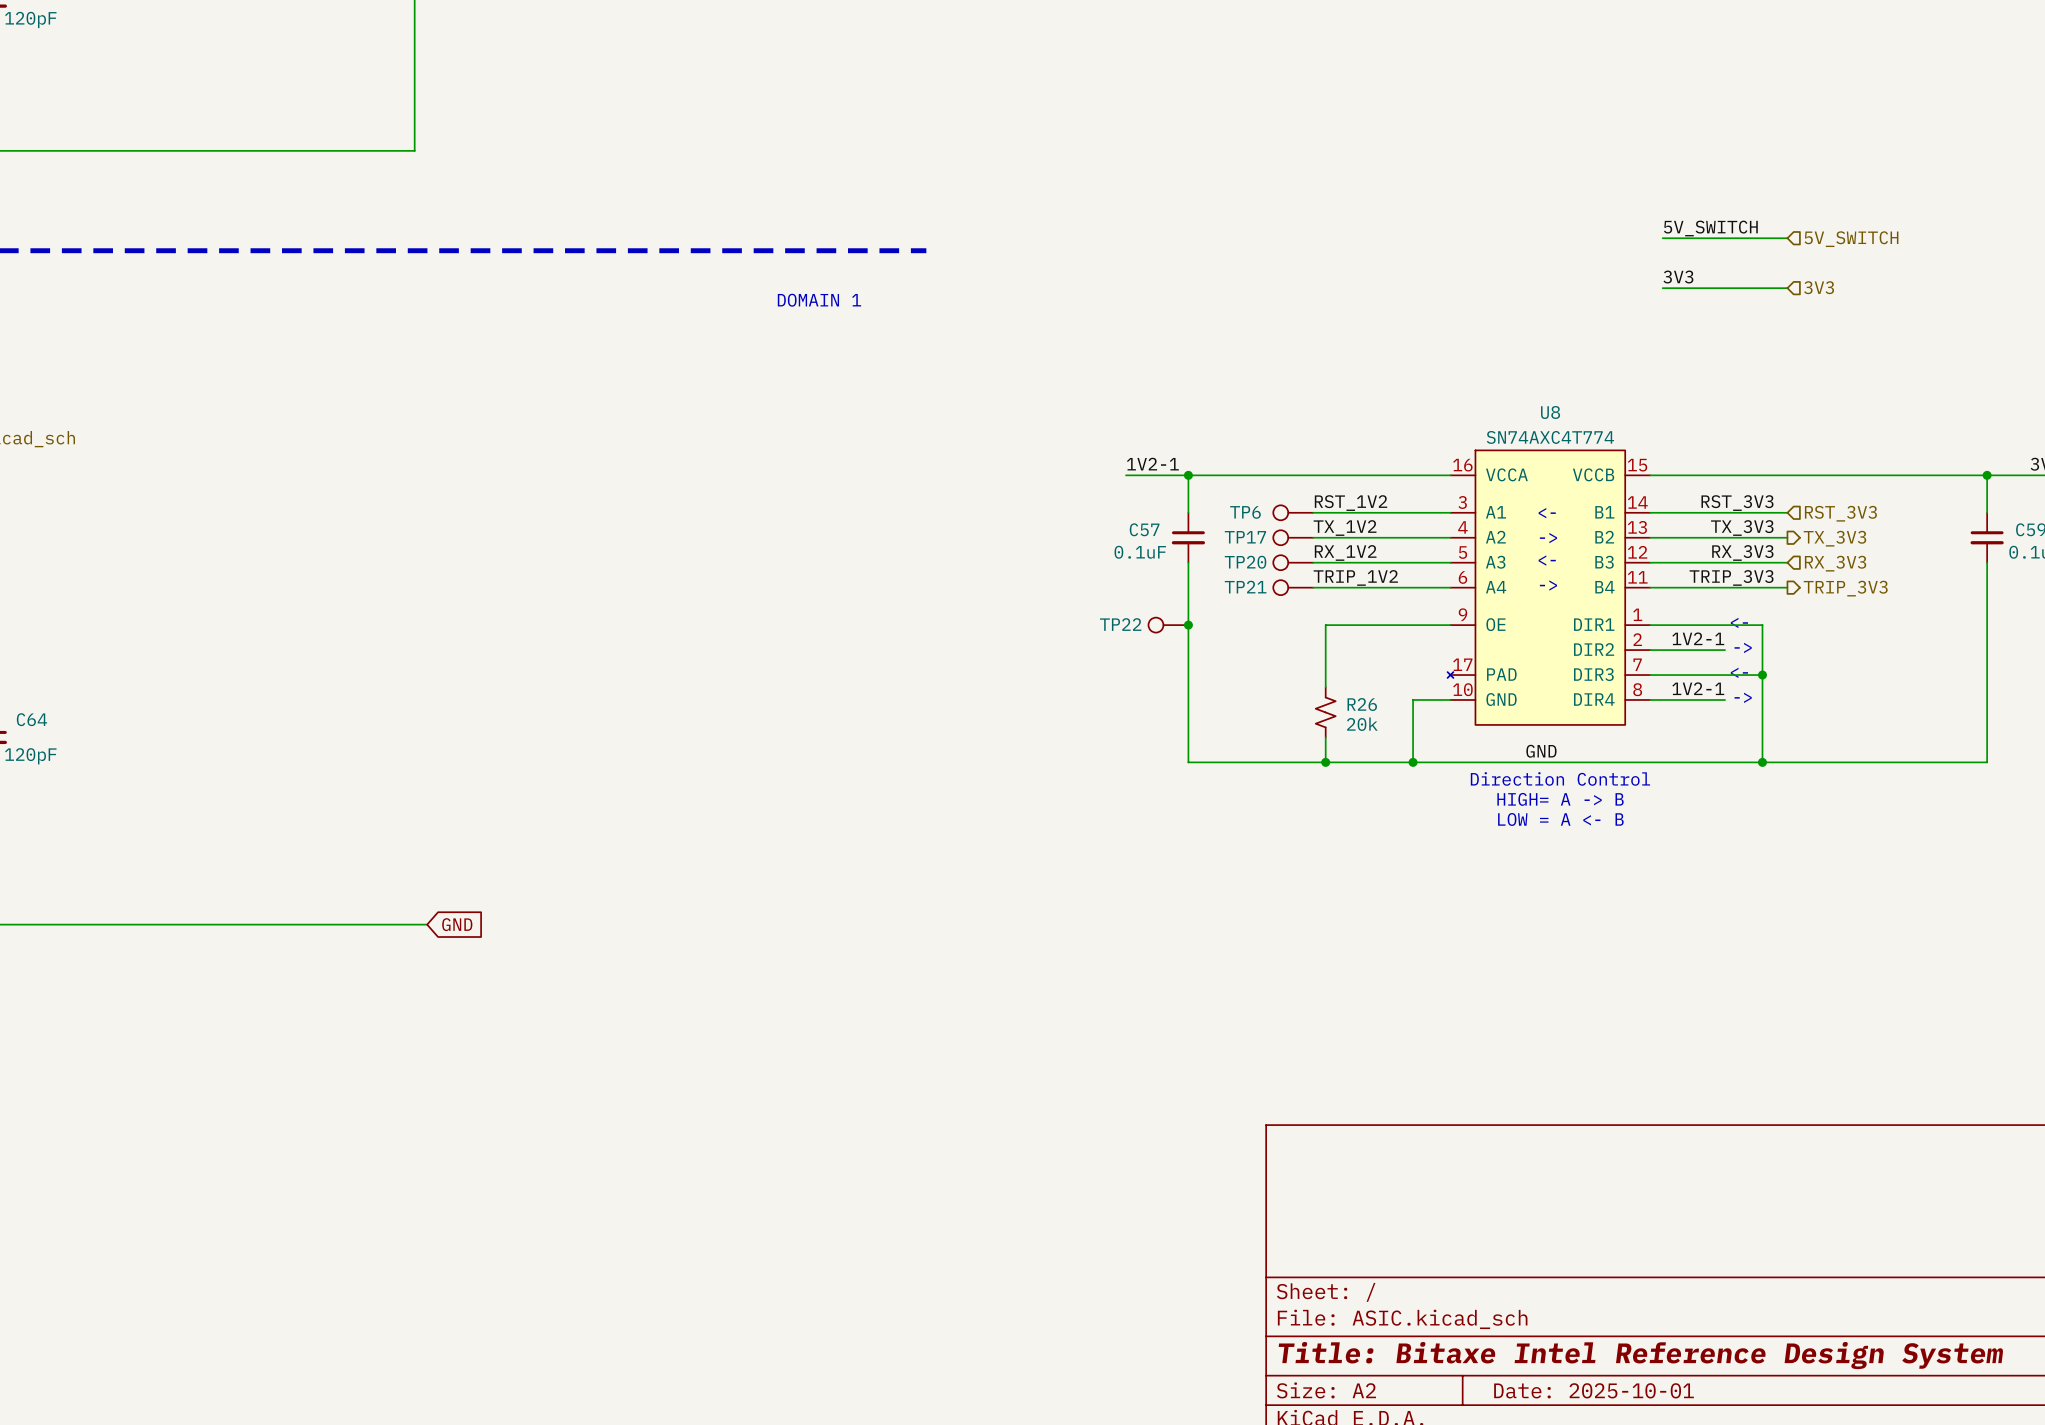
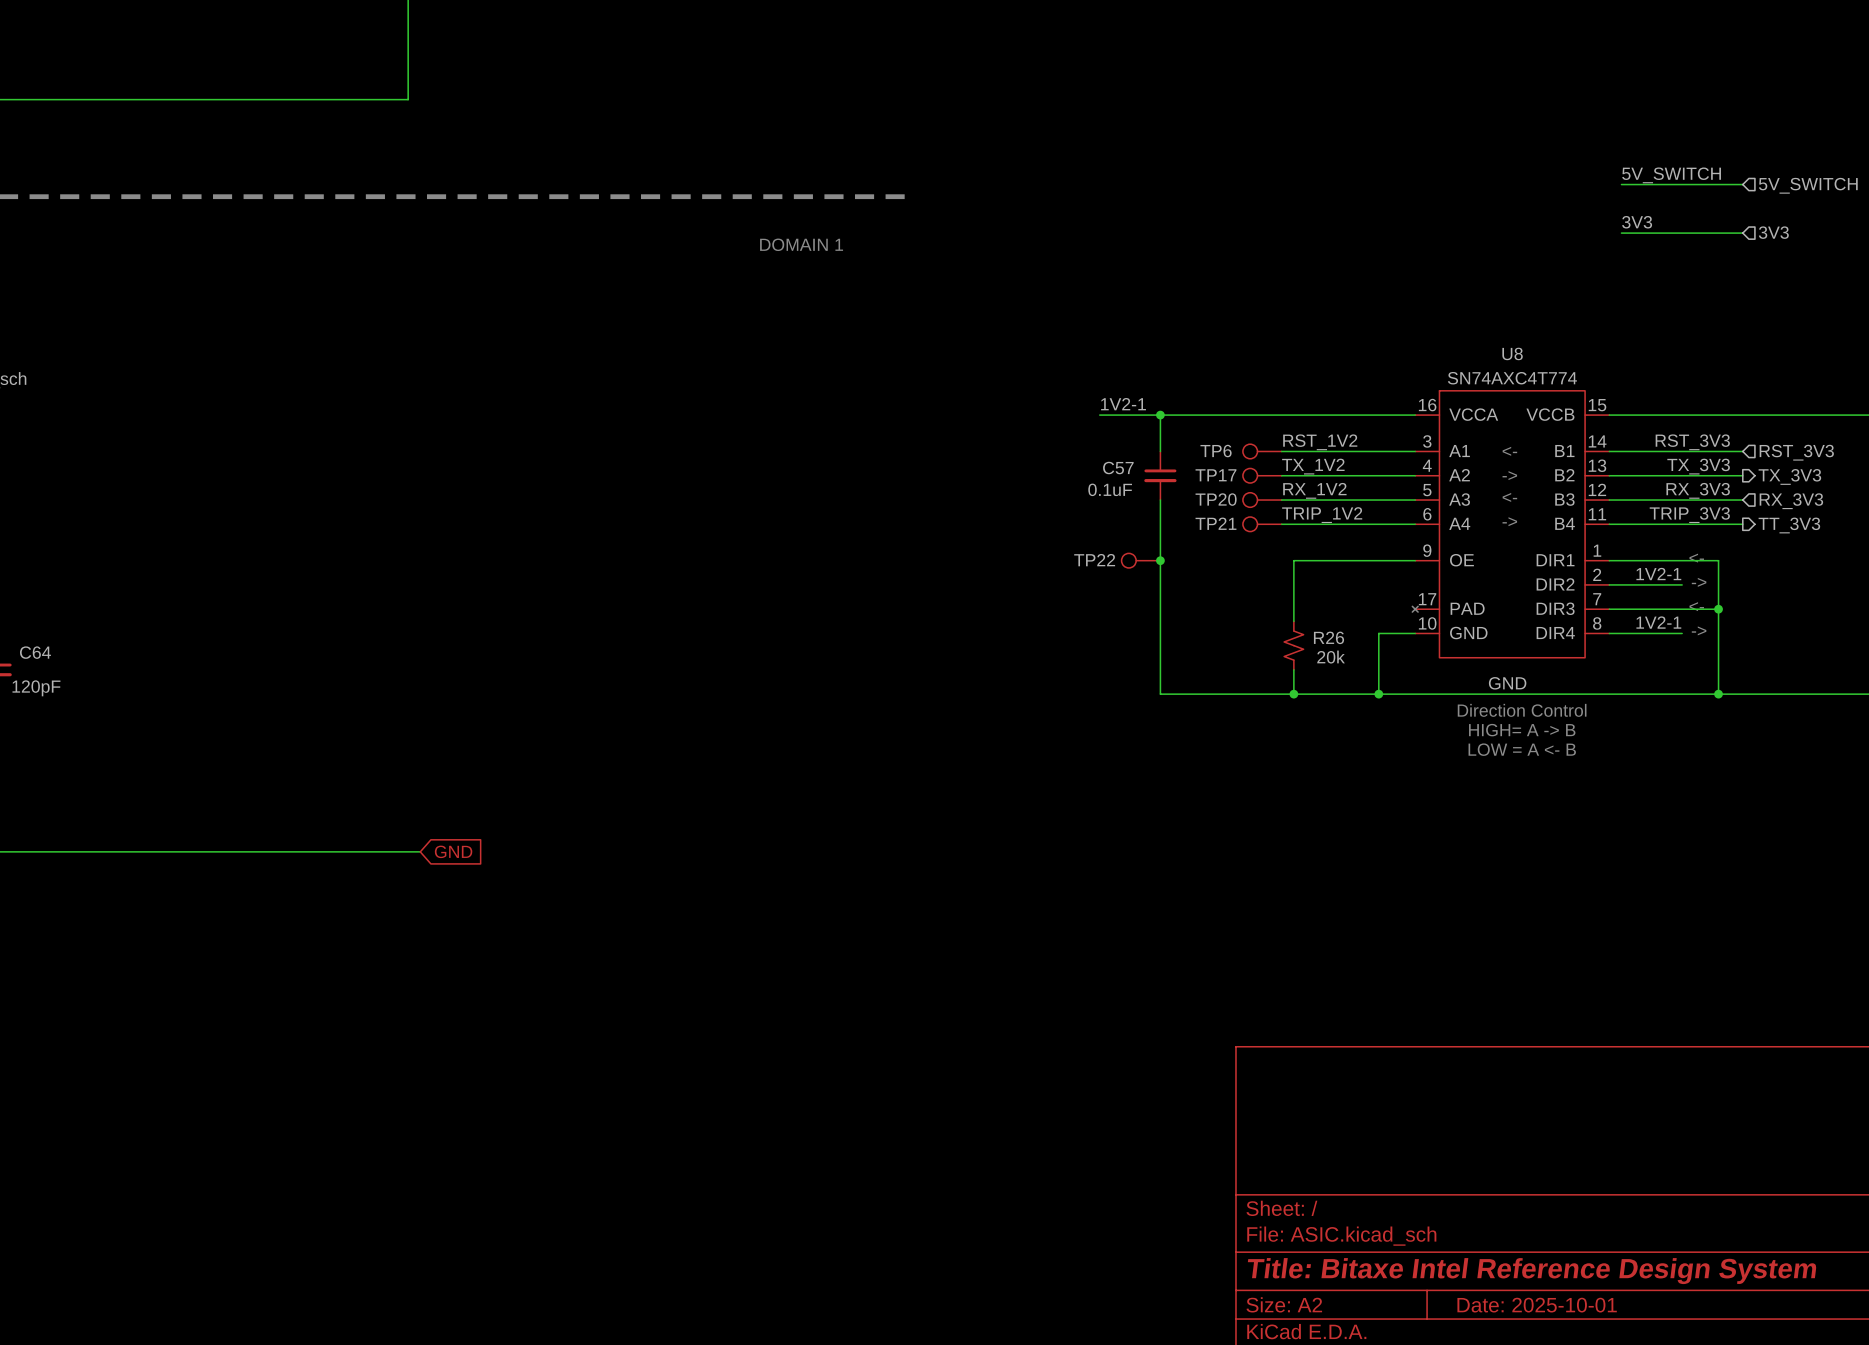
hierarchical label: TRIP_3V3 (1845, 588) -> TT_3V3 (1789, 525)

